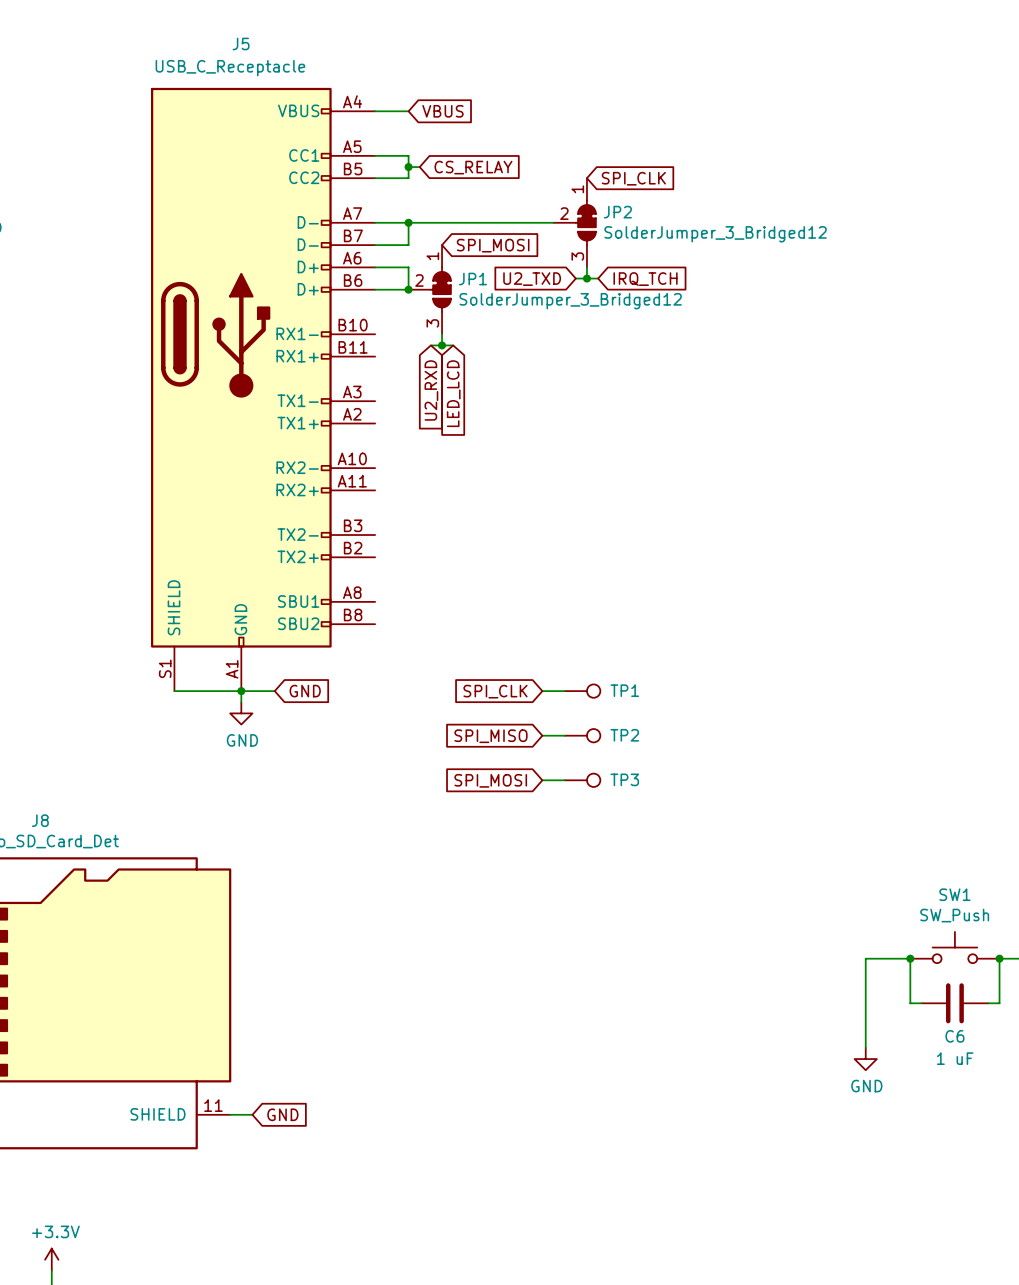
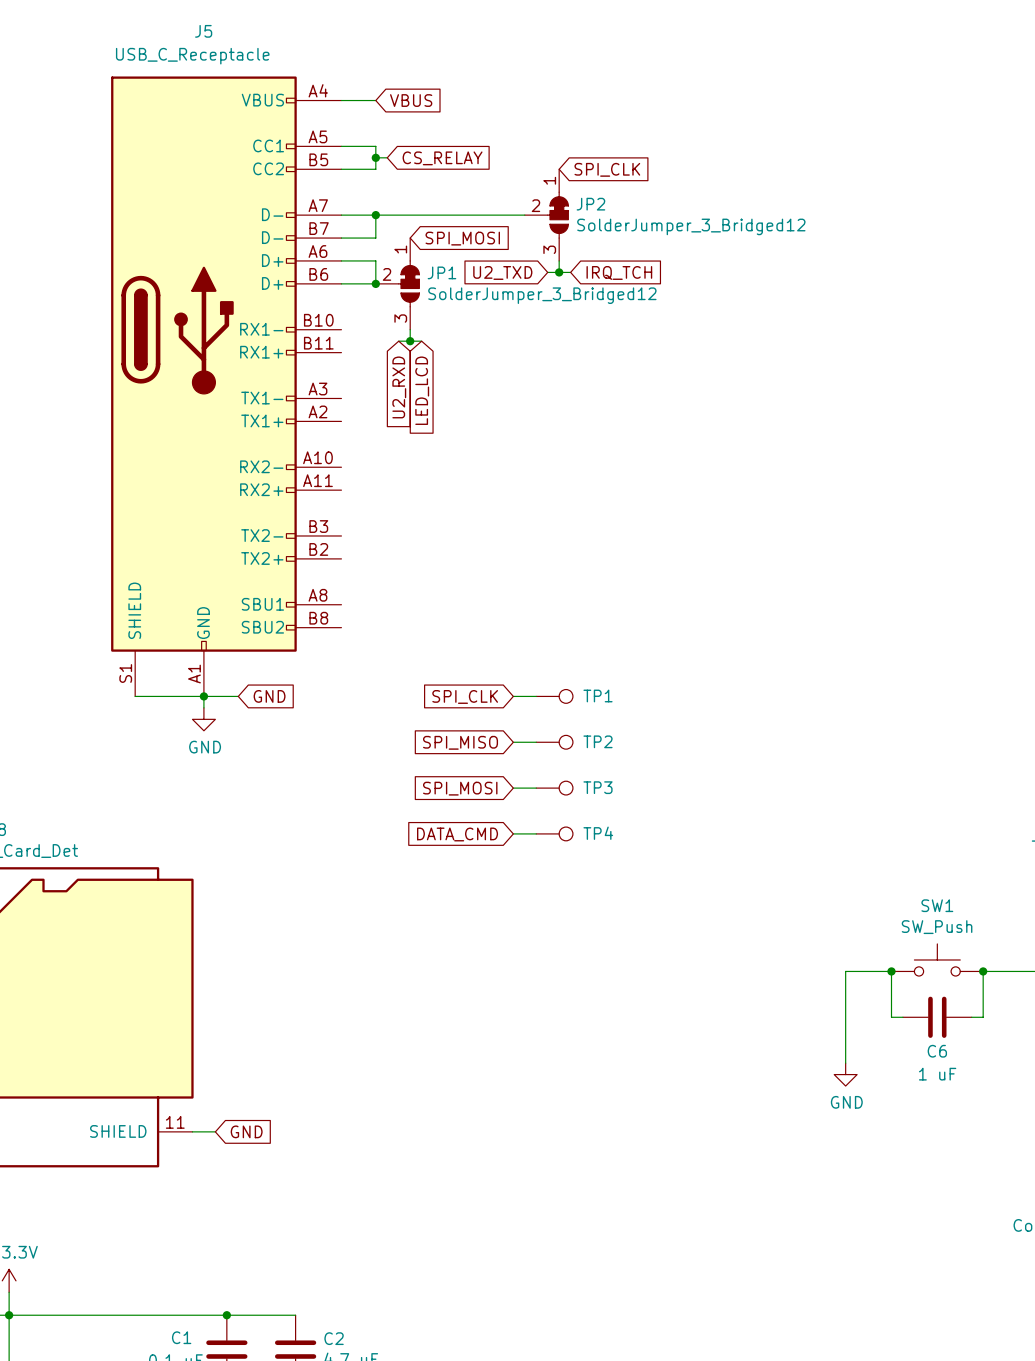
wire: none -> (513, 833) (536, 833)
TP4: none -> (554, 833)
global label: none -> DATA_CMD (457, 834)

